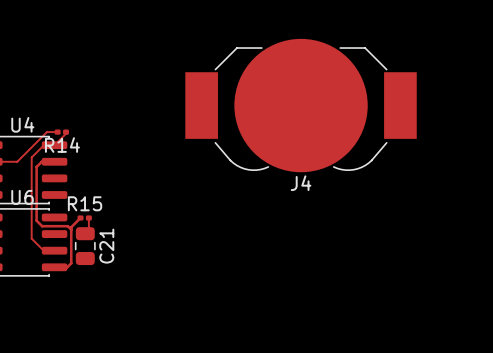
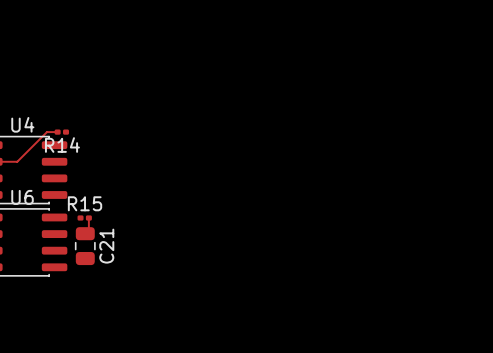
J4: (301, 105) -> none
track: (66, 132) (54, 145) (44, 145) (31, 157) (31, 238) (43, 250) (54, 250) -> none
track: (54, 161) (41, 161) (36, 166) (36, 220) (42, 226) (67, 226) (71, 229) -> none
track: (80, 218) (71, 227) (71, 263) (67, 267) (54, 267) (58, 267) -> none

